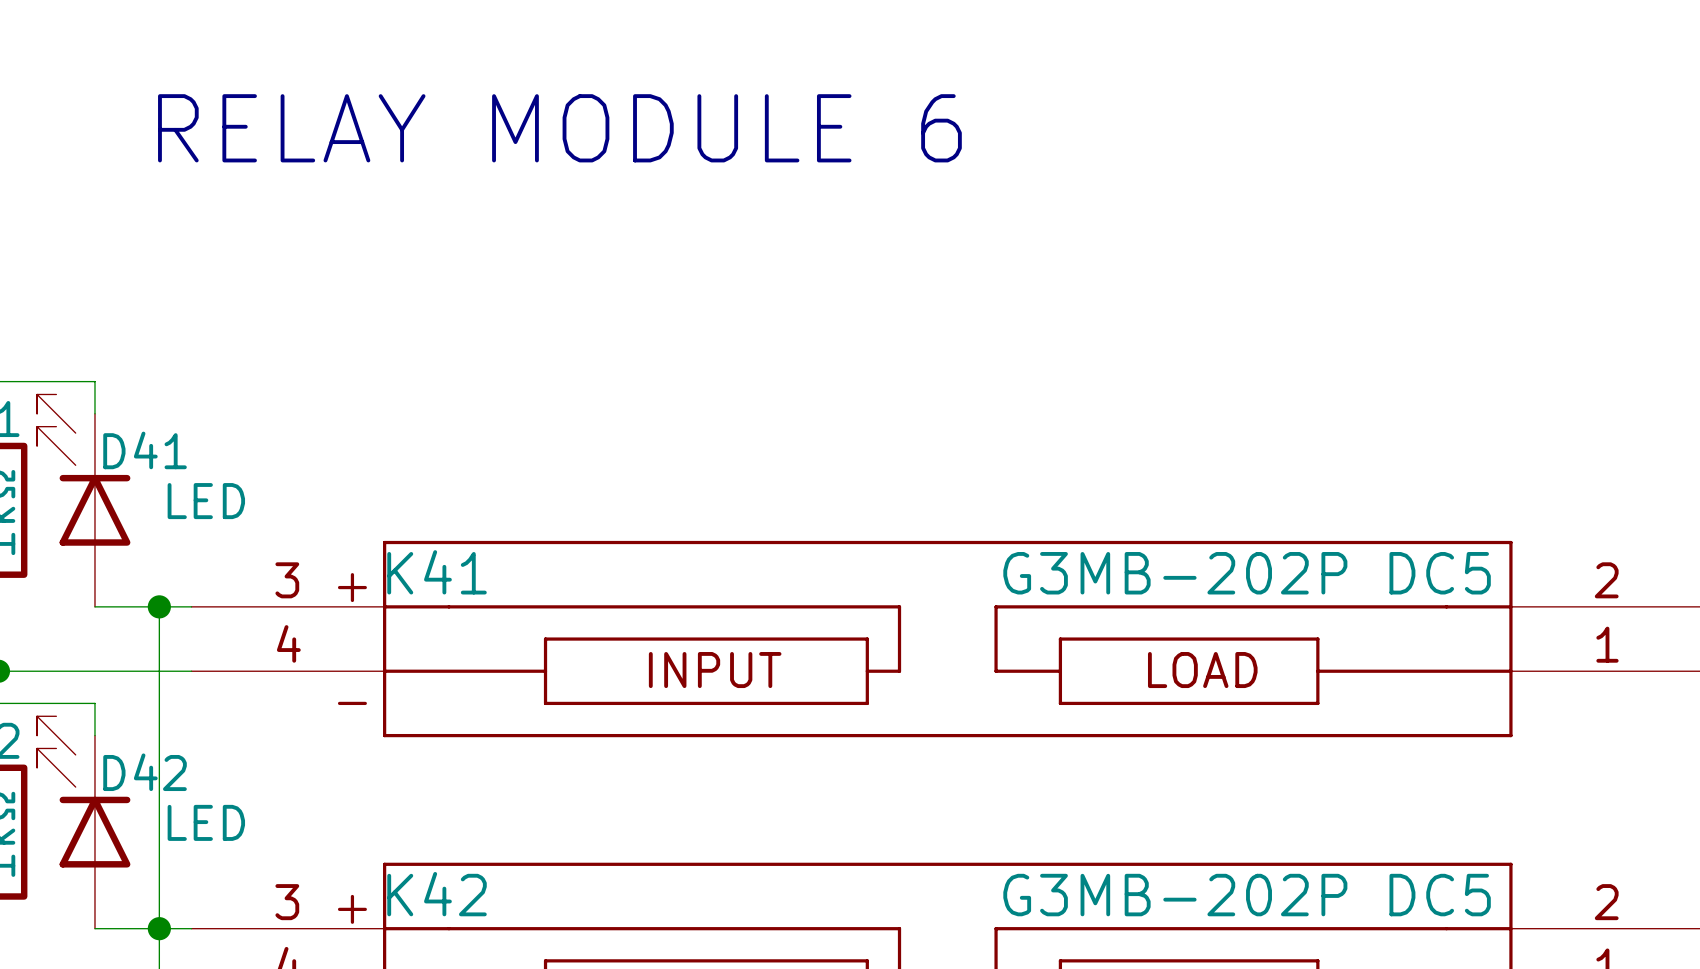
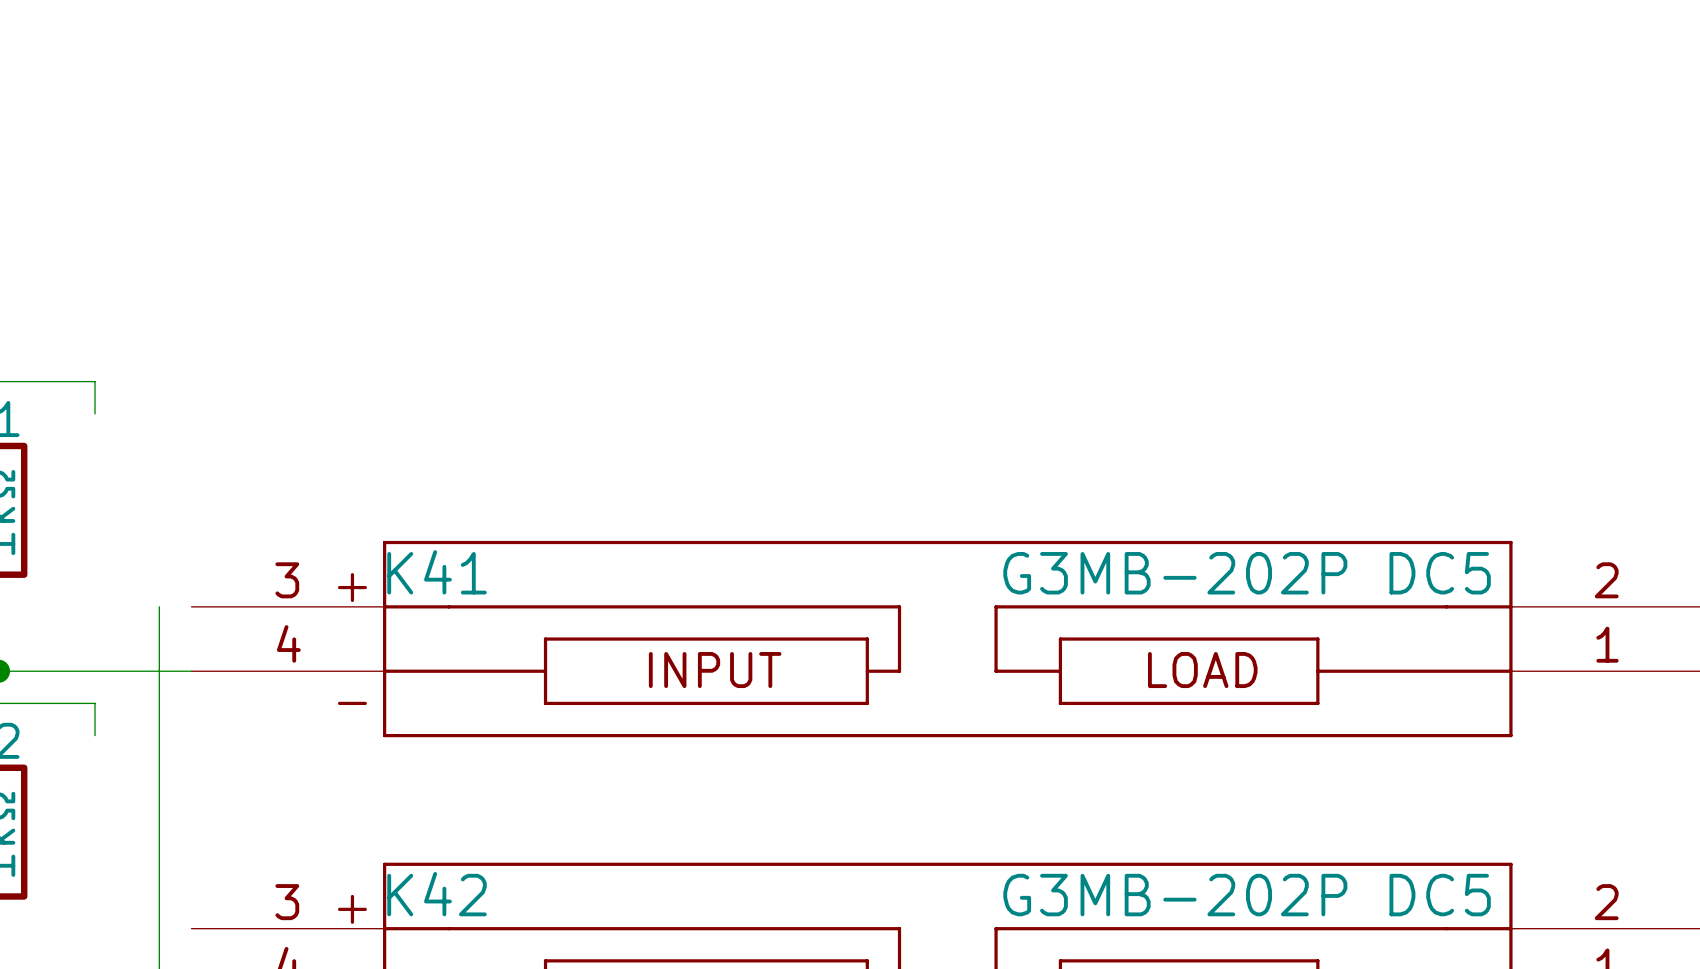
text: RELAY MODULE 6 (559, 128) -> none
D41: LED (83, 500) -> none
wire: (94, 606) (191, 606) -> none
junction: (159, 606) -> none
D42: LED (83, 822) -> none
wire: (94, 928) (191, 928) -> none
junction: (159, 928) -> none

